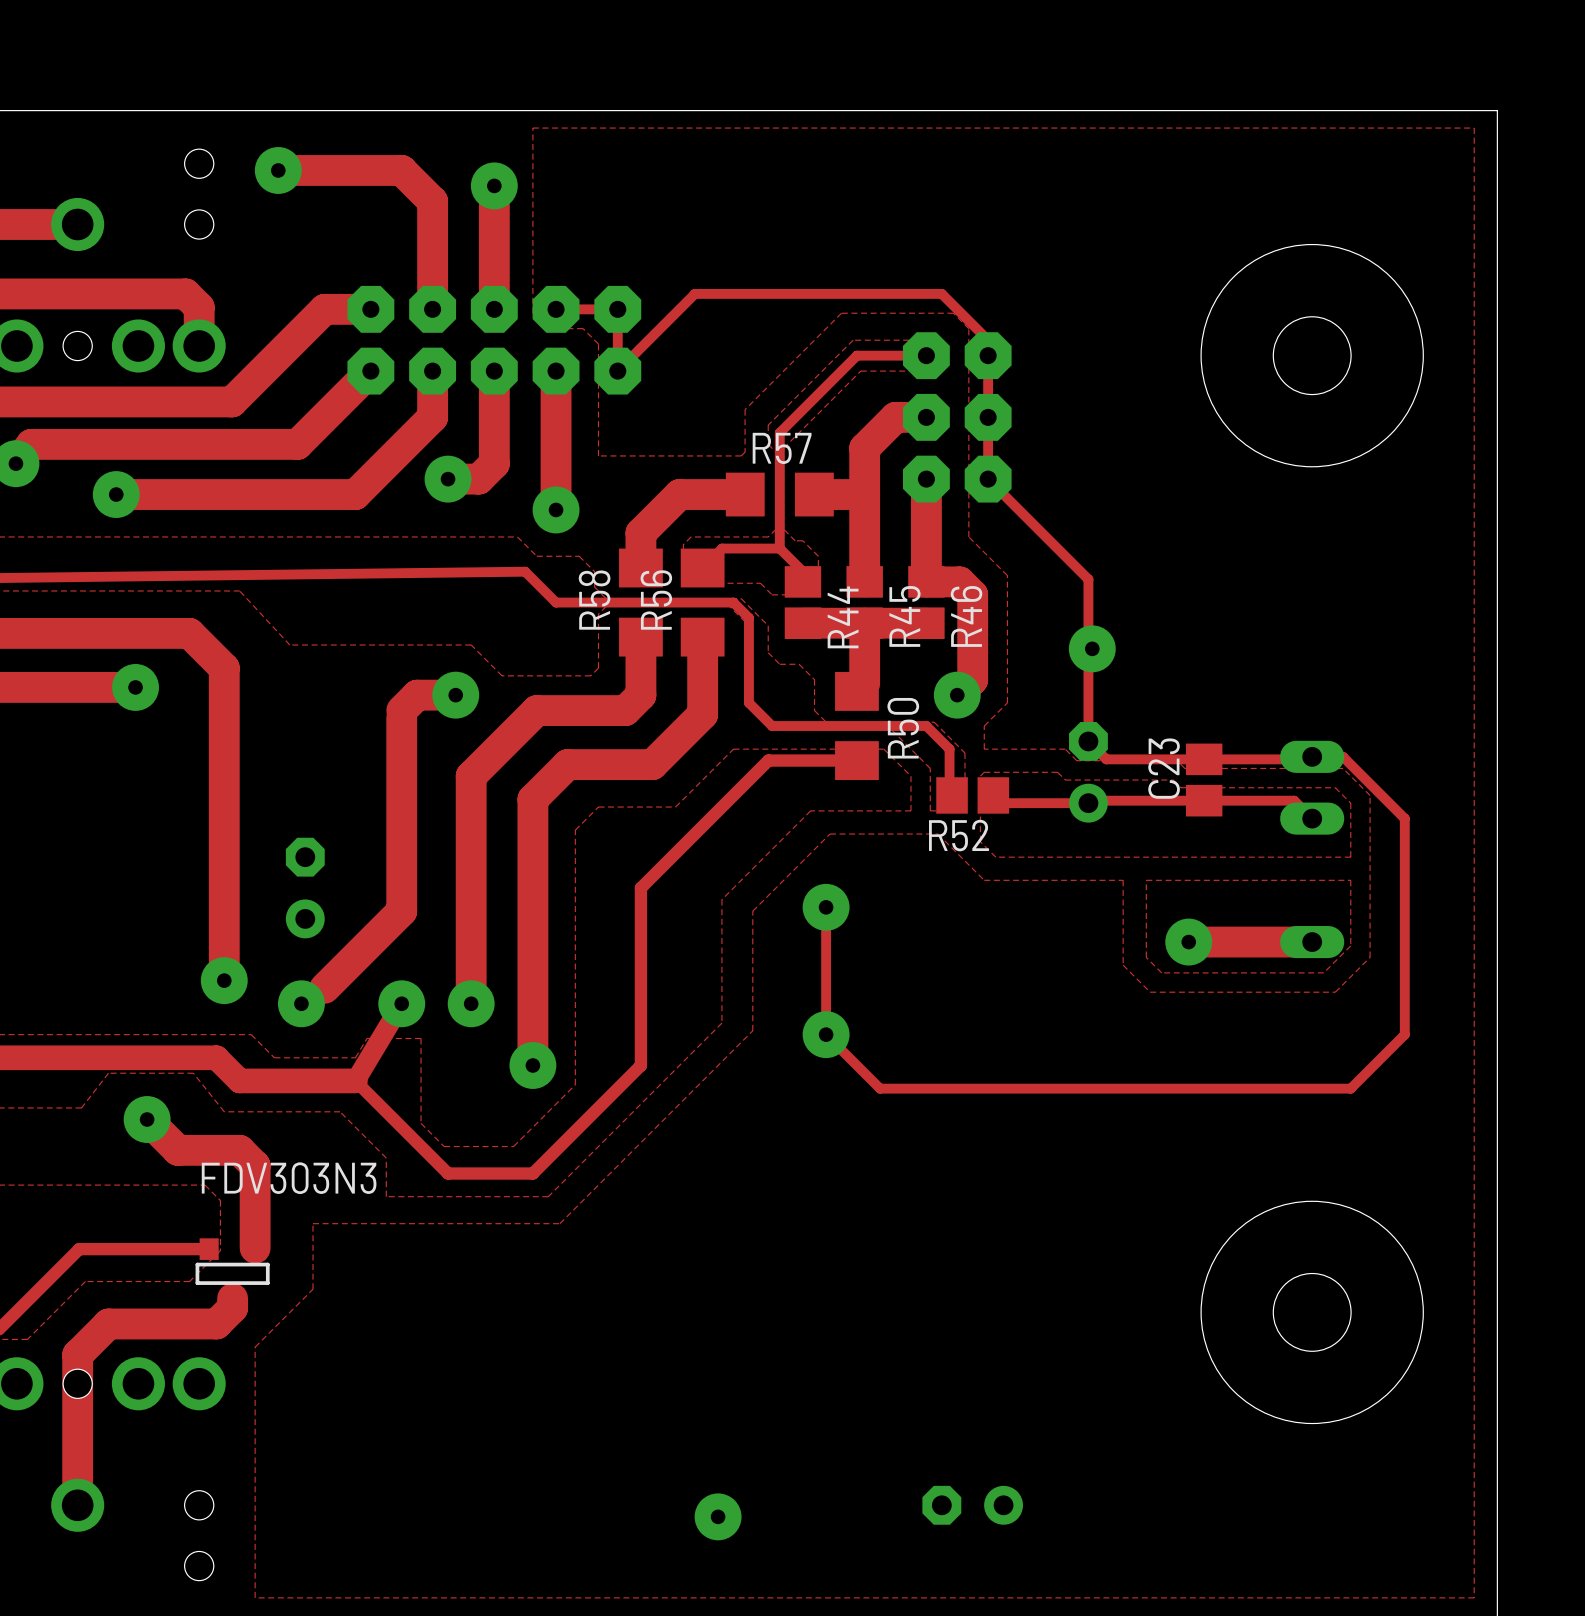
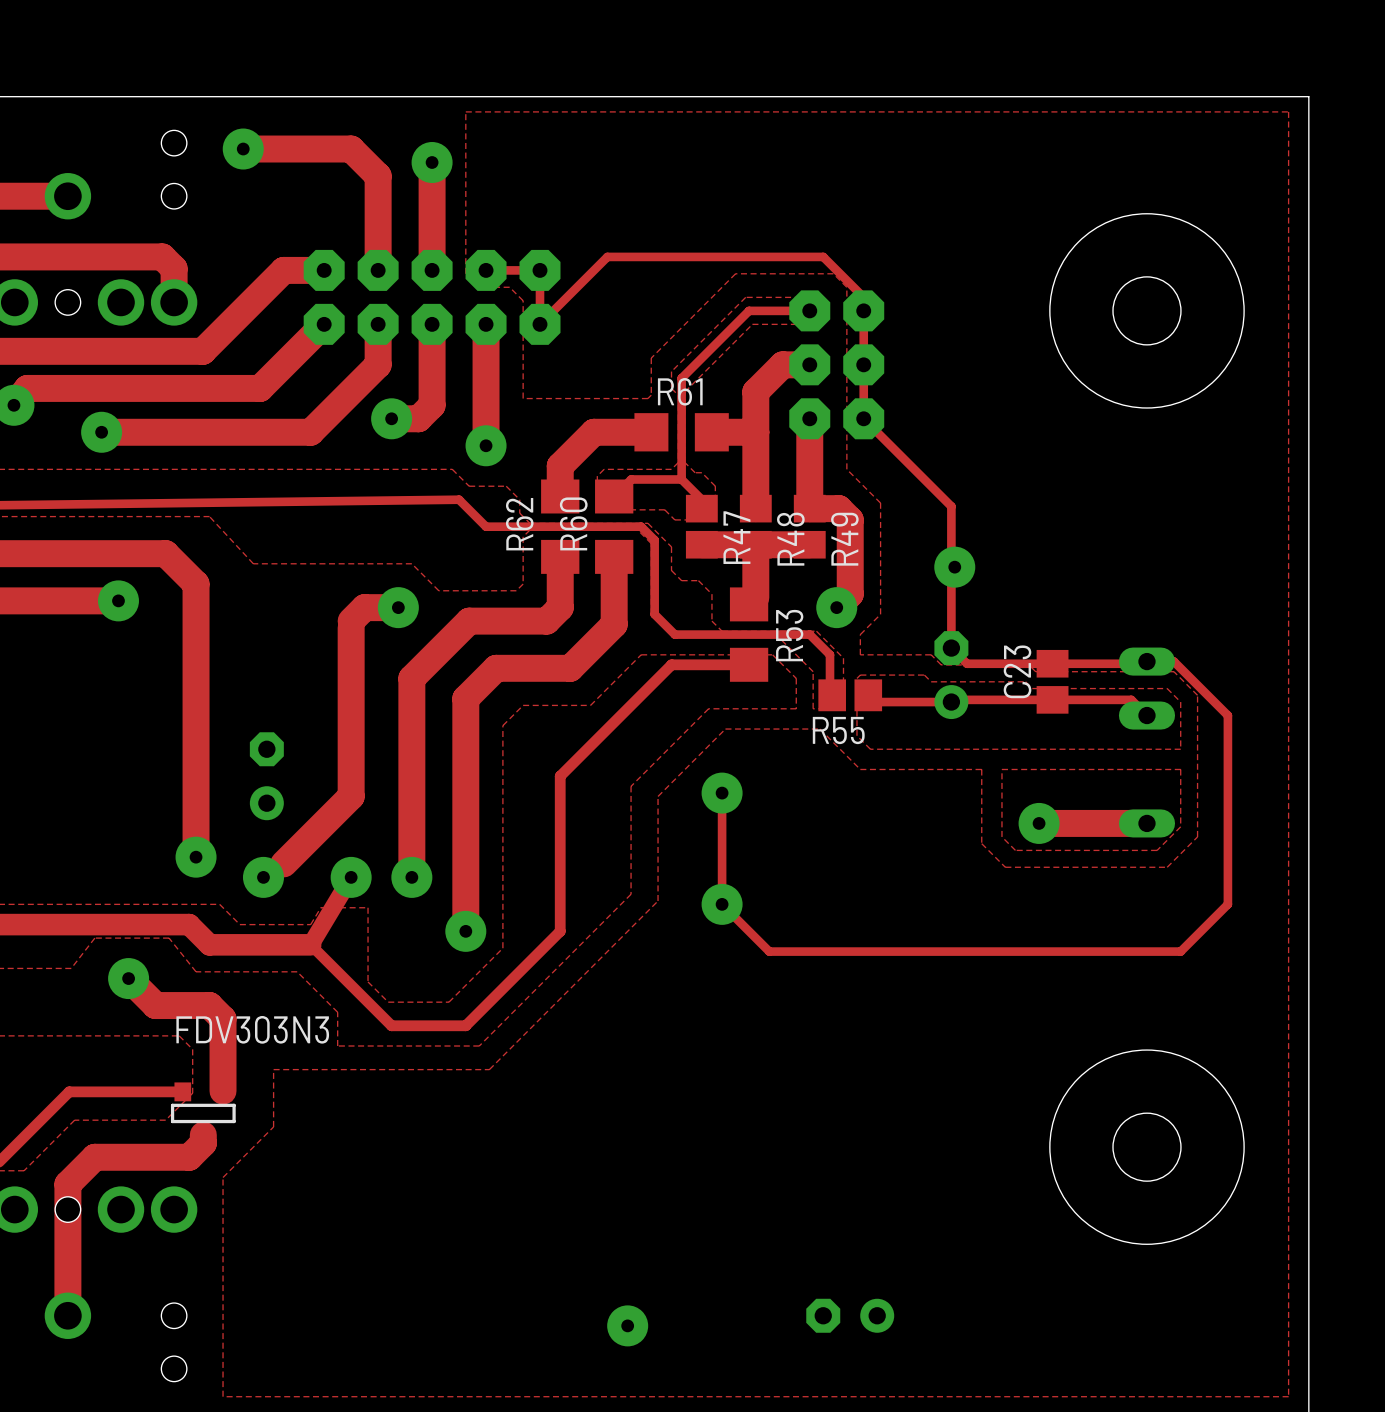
R57 name: R57 (782, 448) -> R61 (680, 391)
R56 name: R56 (656, 599) -> R60 (573, 523)
R58 name: R58 (594, 600) -> R62 (519, 524)
R45 name: R45 (904, 616) -> R48 (790, 539)
R46 name: R46 (966, 616) -> R49 (844, 539)
R44 name: R44 (843, 617) -> R47 (736, 537)
R50 name: R50 (903, 728) -> R53 (789, 635)
R52 name: R52 (958, 835) -> R55 (838, 730)

